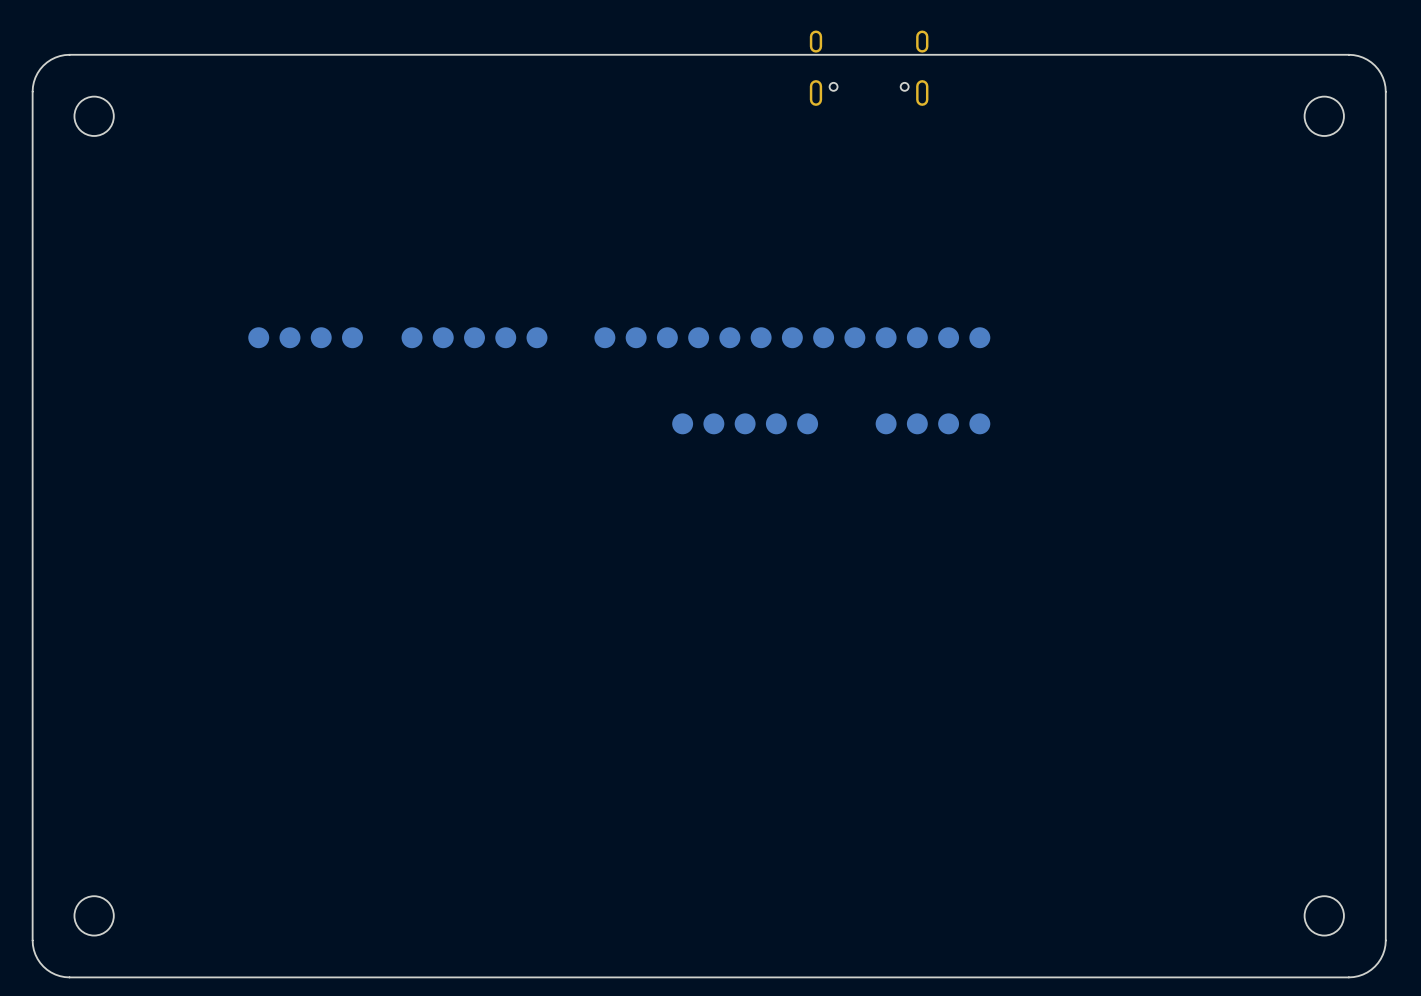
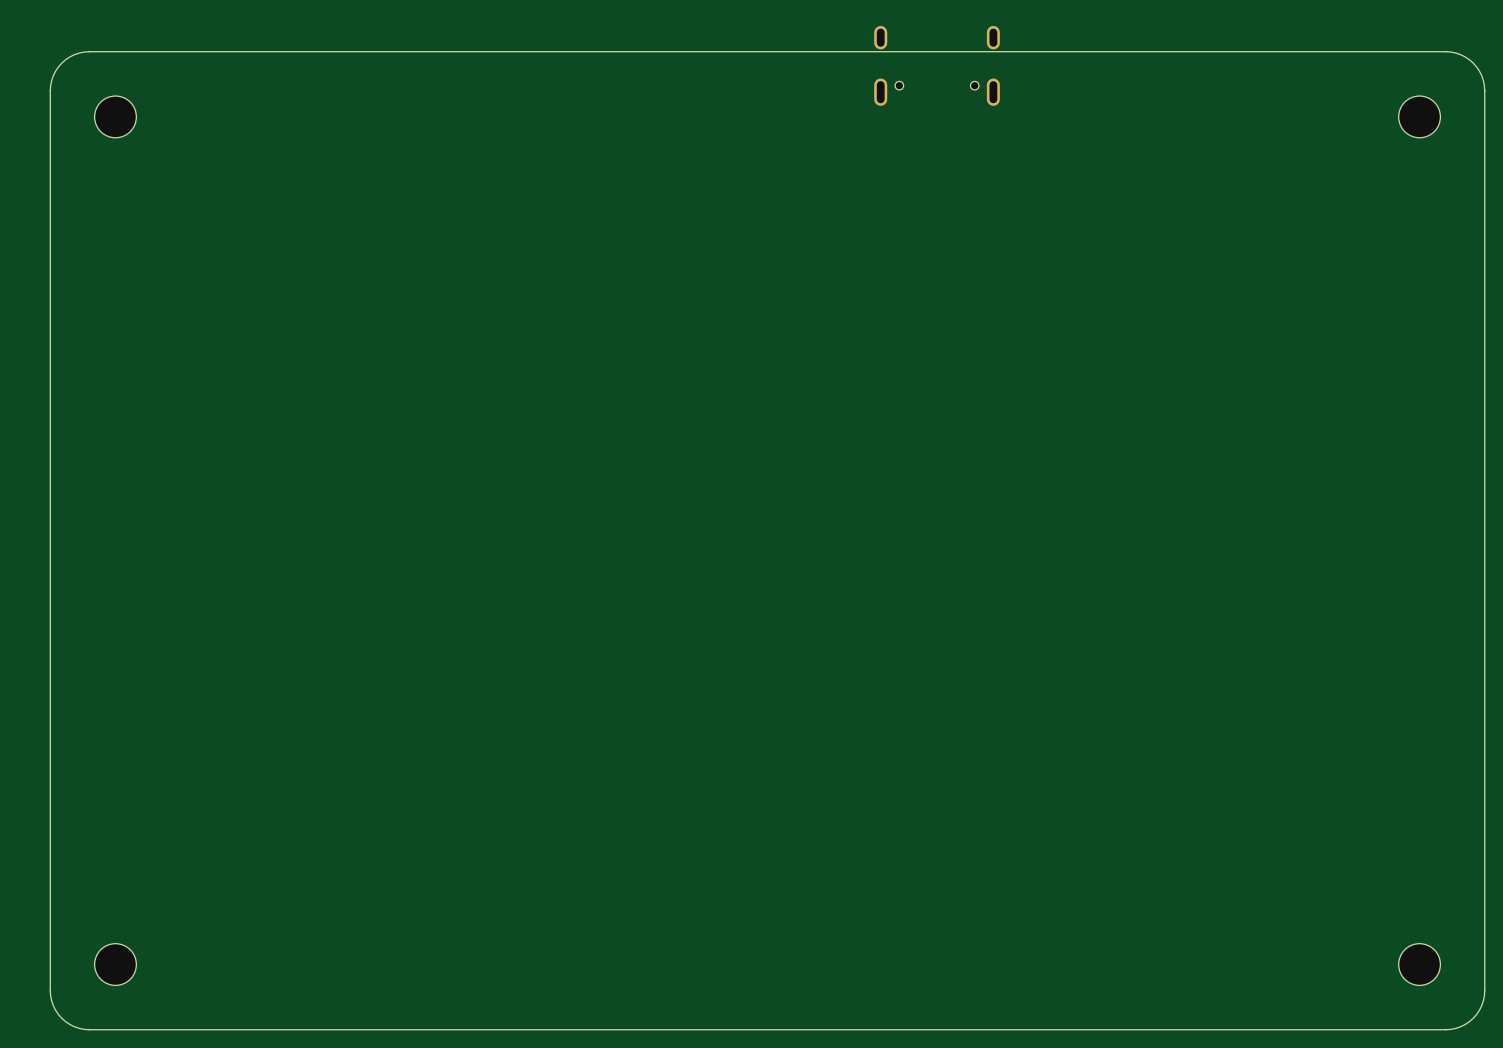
part: (305, 337) -> none
part: (474, 337) -> none
part: (792, 337) -> none
part: (745, 423) -> none
part: (932, 423) -> none

